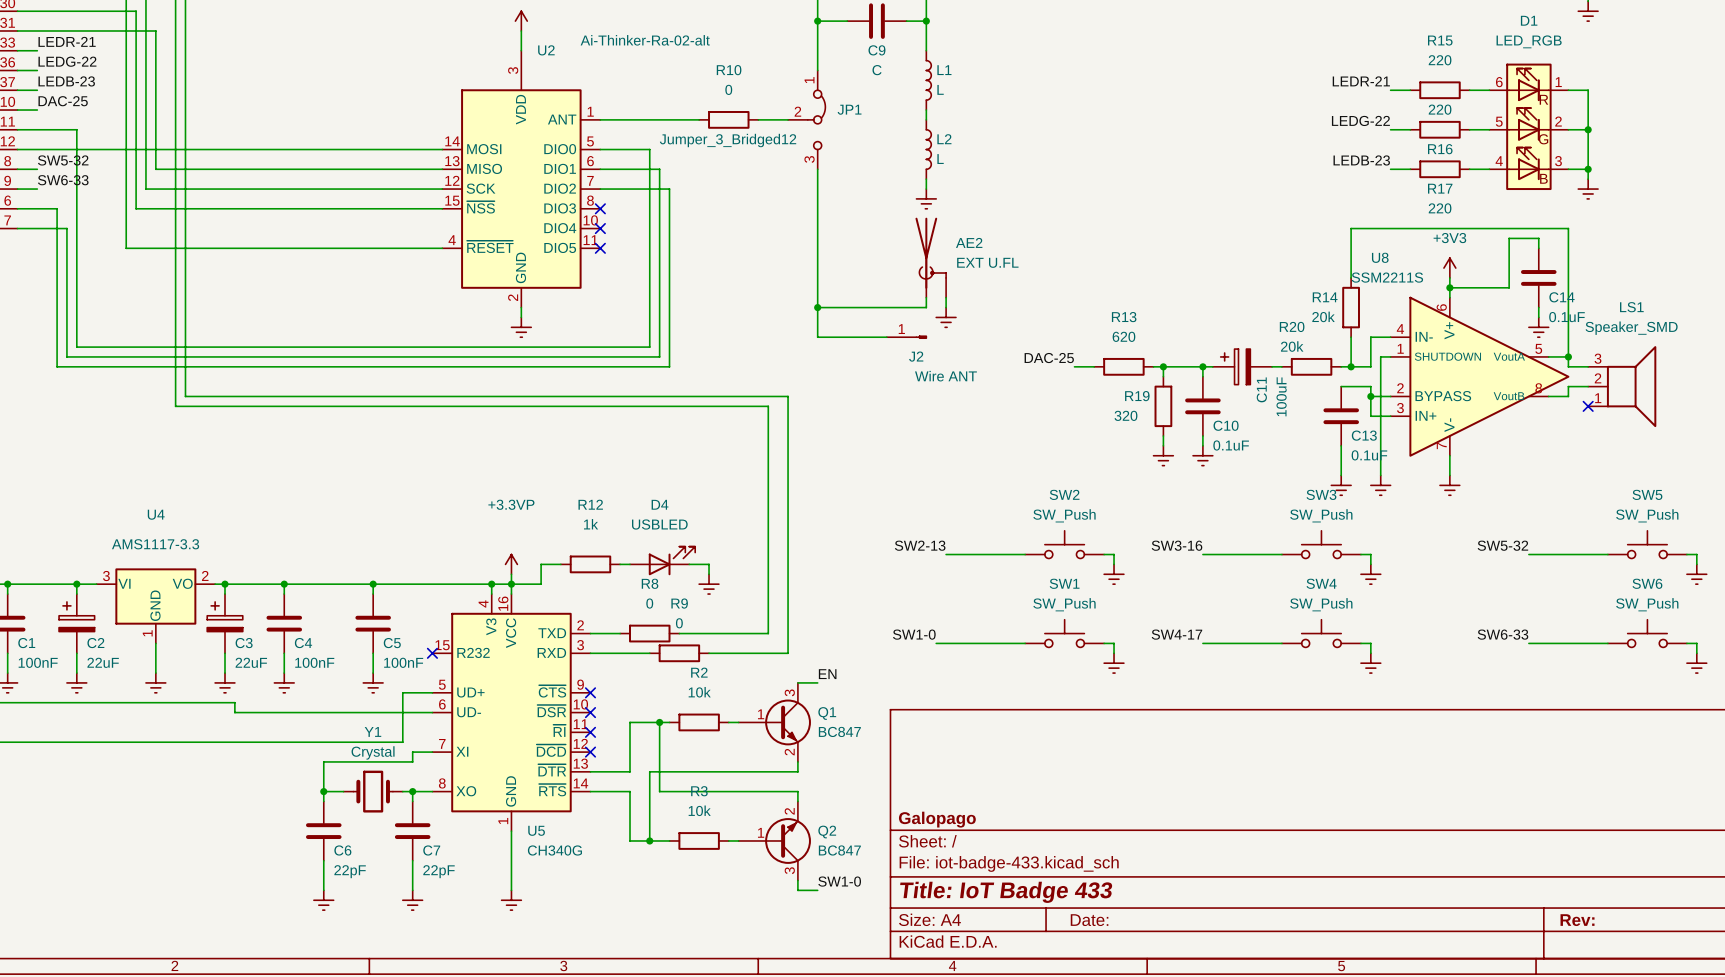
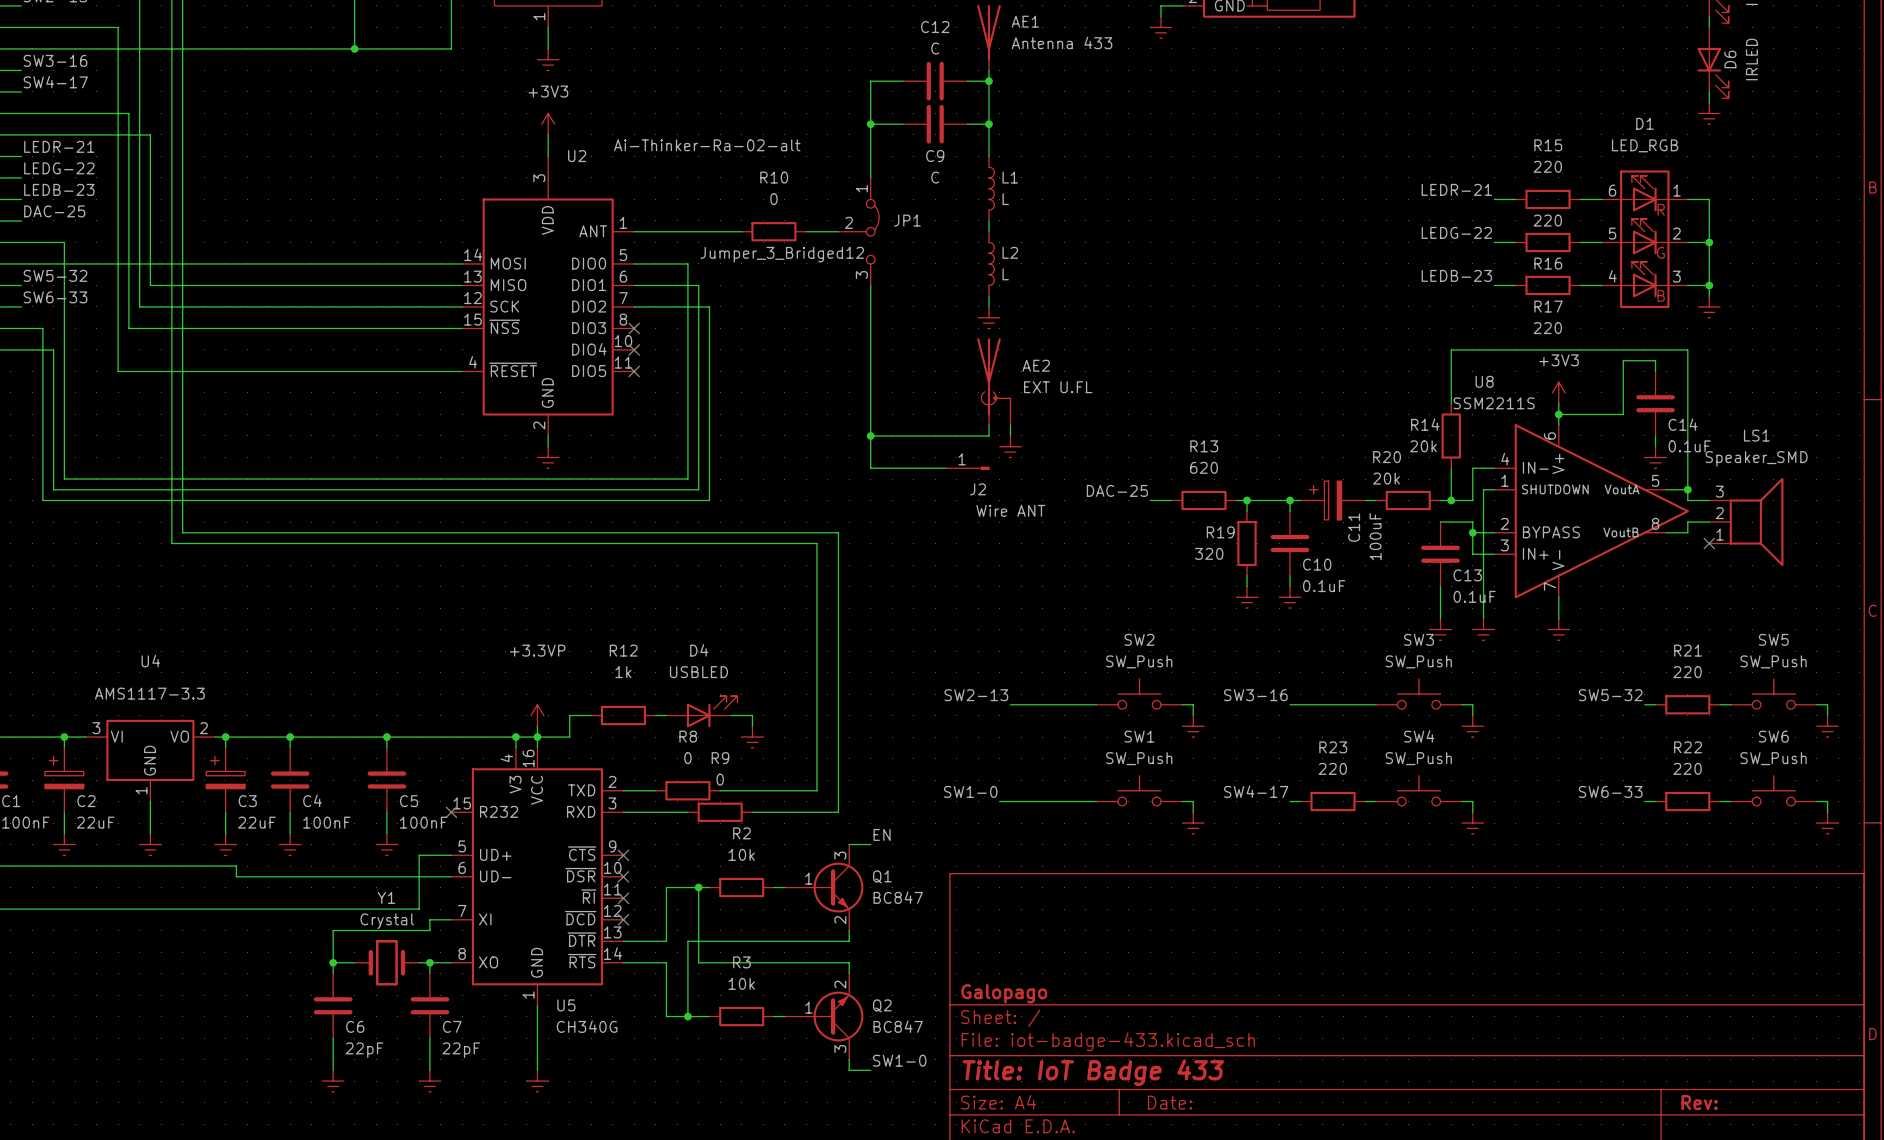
wire: (1538, 554) (1598, 554) -> none
R21: none -> 220 (1687, 704)
wire: (1212, 643) (1272, 643) -> none
R23: none -> 220 (1333, 801)
wire: (1538, 643) (1598, 643) -> none
R22: none -> 220 (1687, 801)

